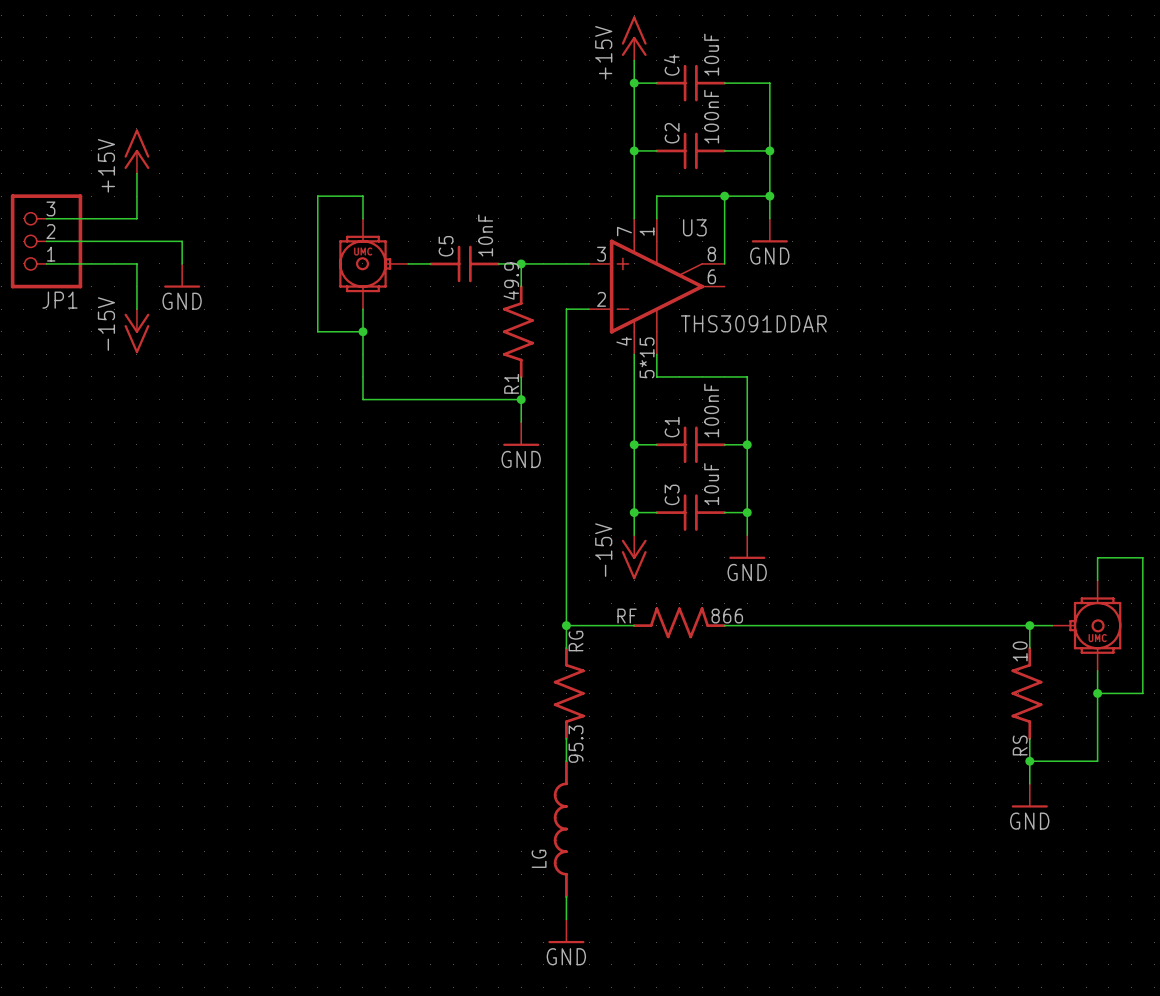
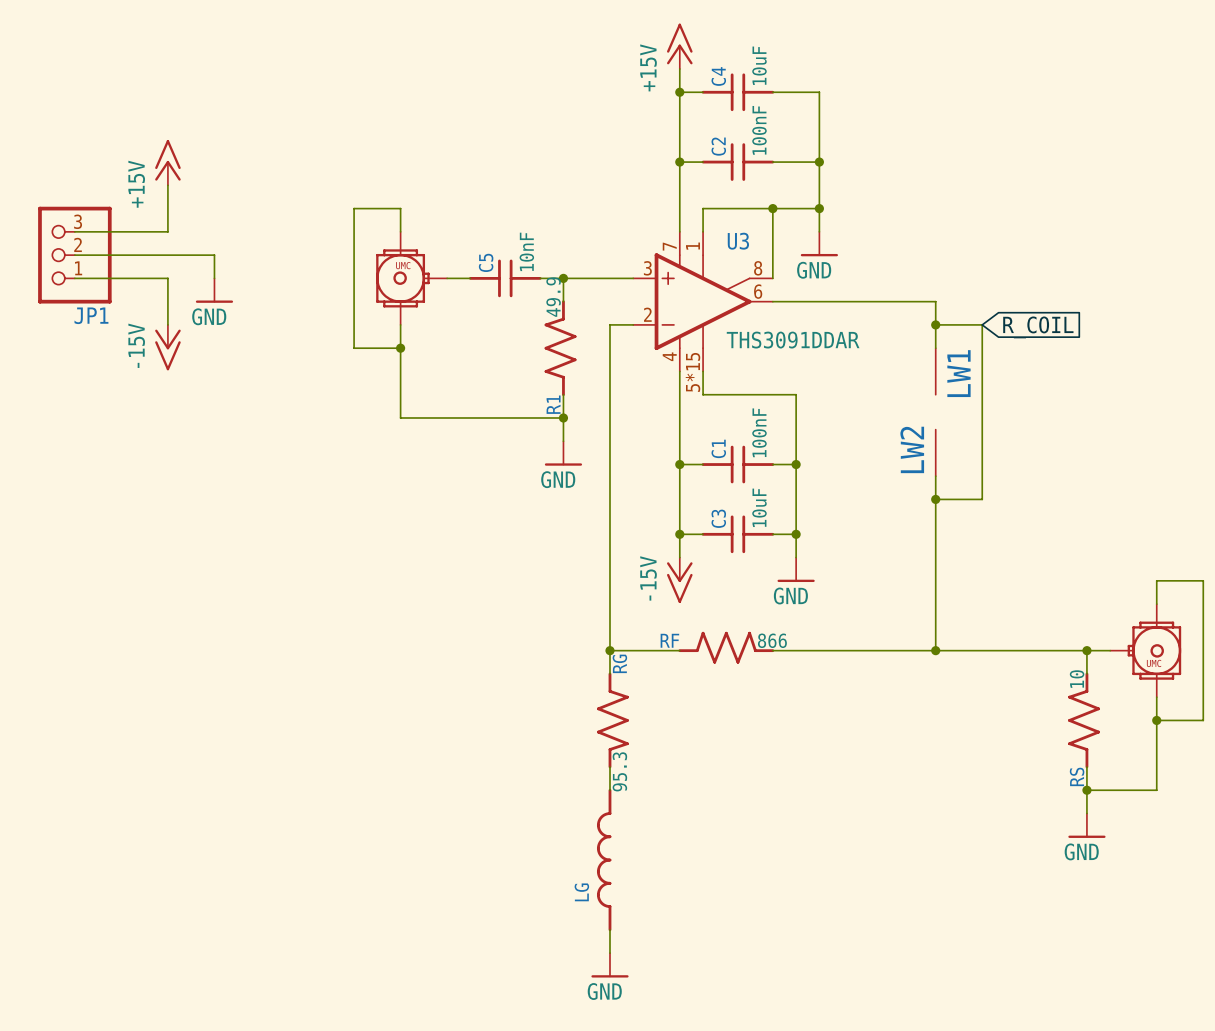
wire: none -> (772, 301) (935, 301) (935, 348)
wire: none -> (935, 324) (982, 324) (982, 499) (935, 499)
junction: none -> (935, 324)
global label: none -> R_COIL (1038, 327)
LW1: none -> (935, 371)
LW2: none -> (935, 452)
wire: none -> (935, 476) (935, 650)
junction: none -> (935, 499)
junction: none -> (935, 650)

